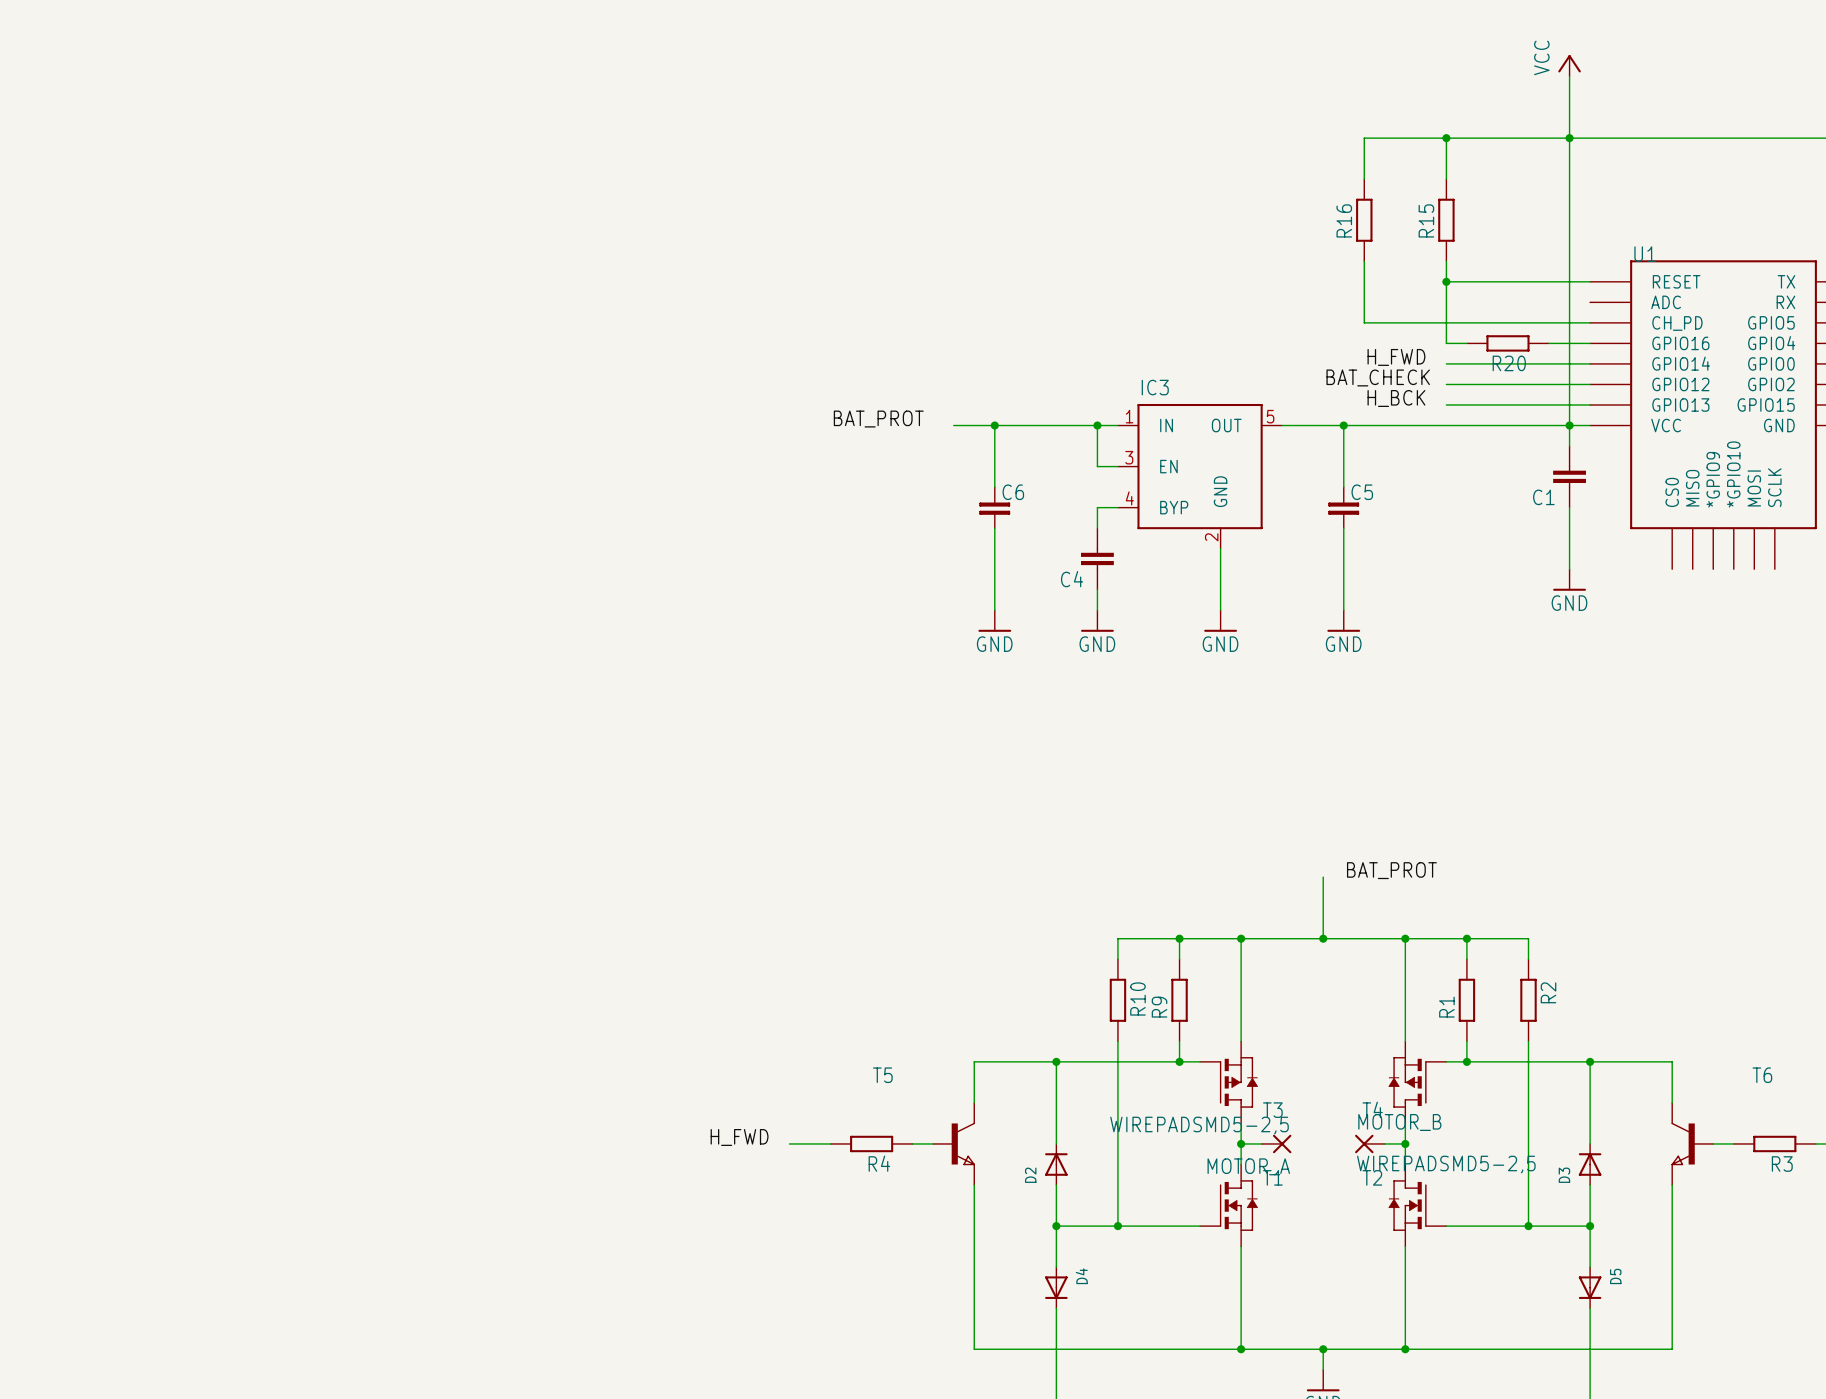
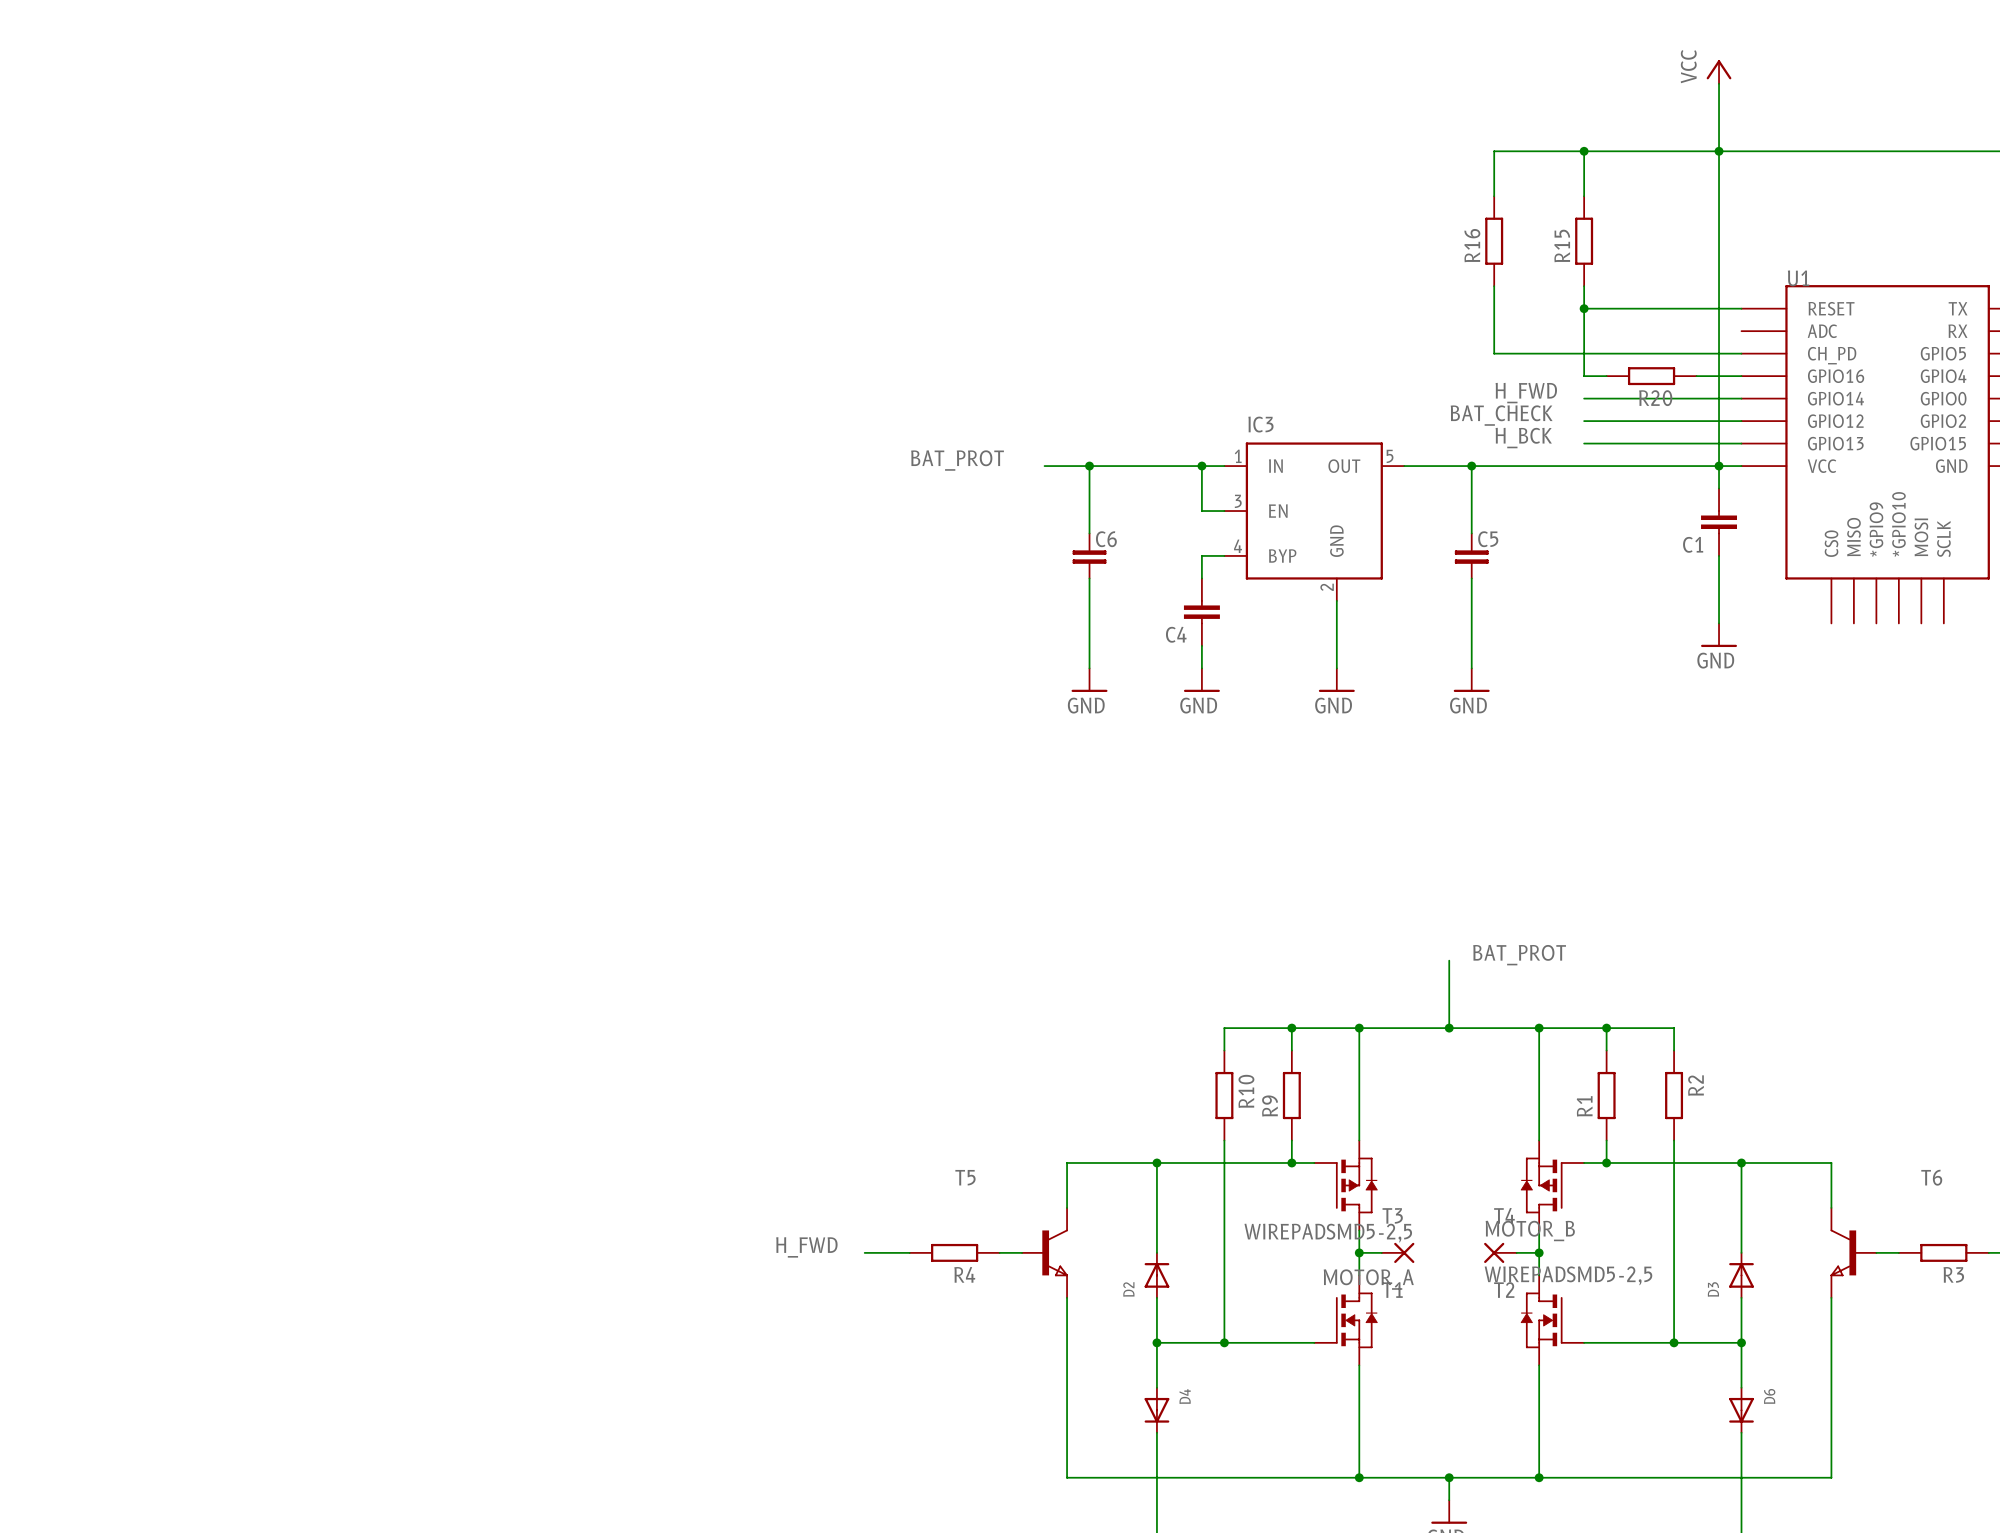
D5 name: D5 (1615, 1276) -> D6 (1769, 1396)

